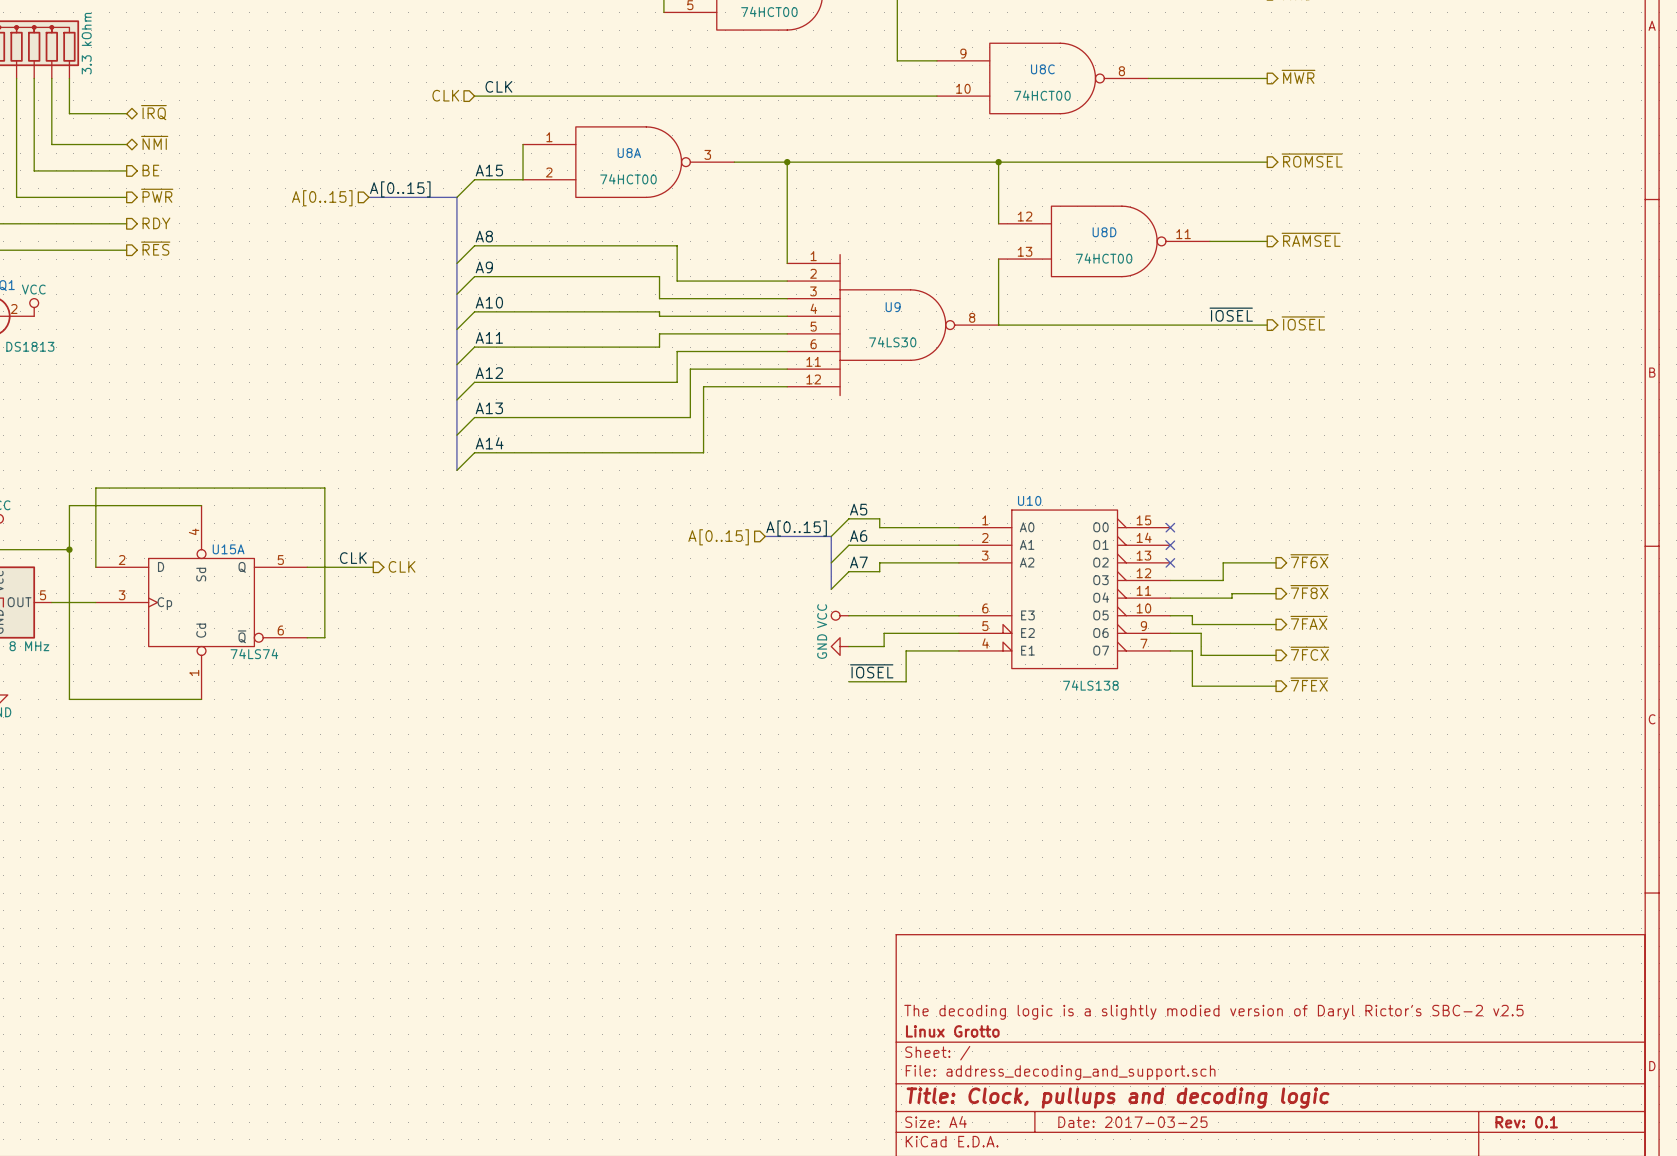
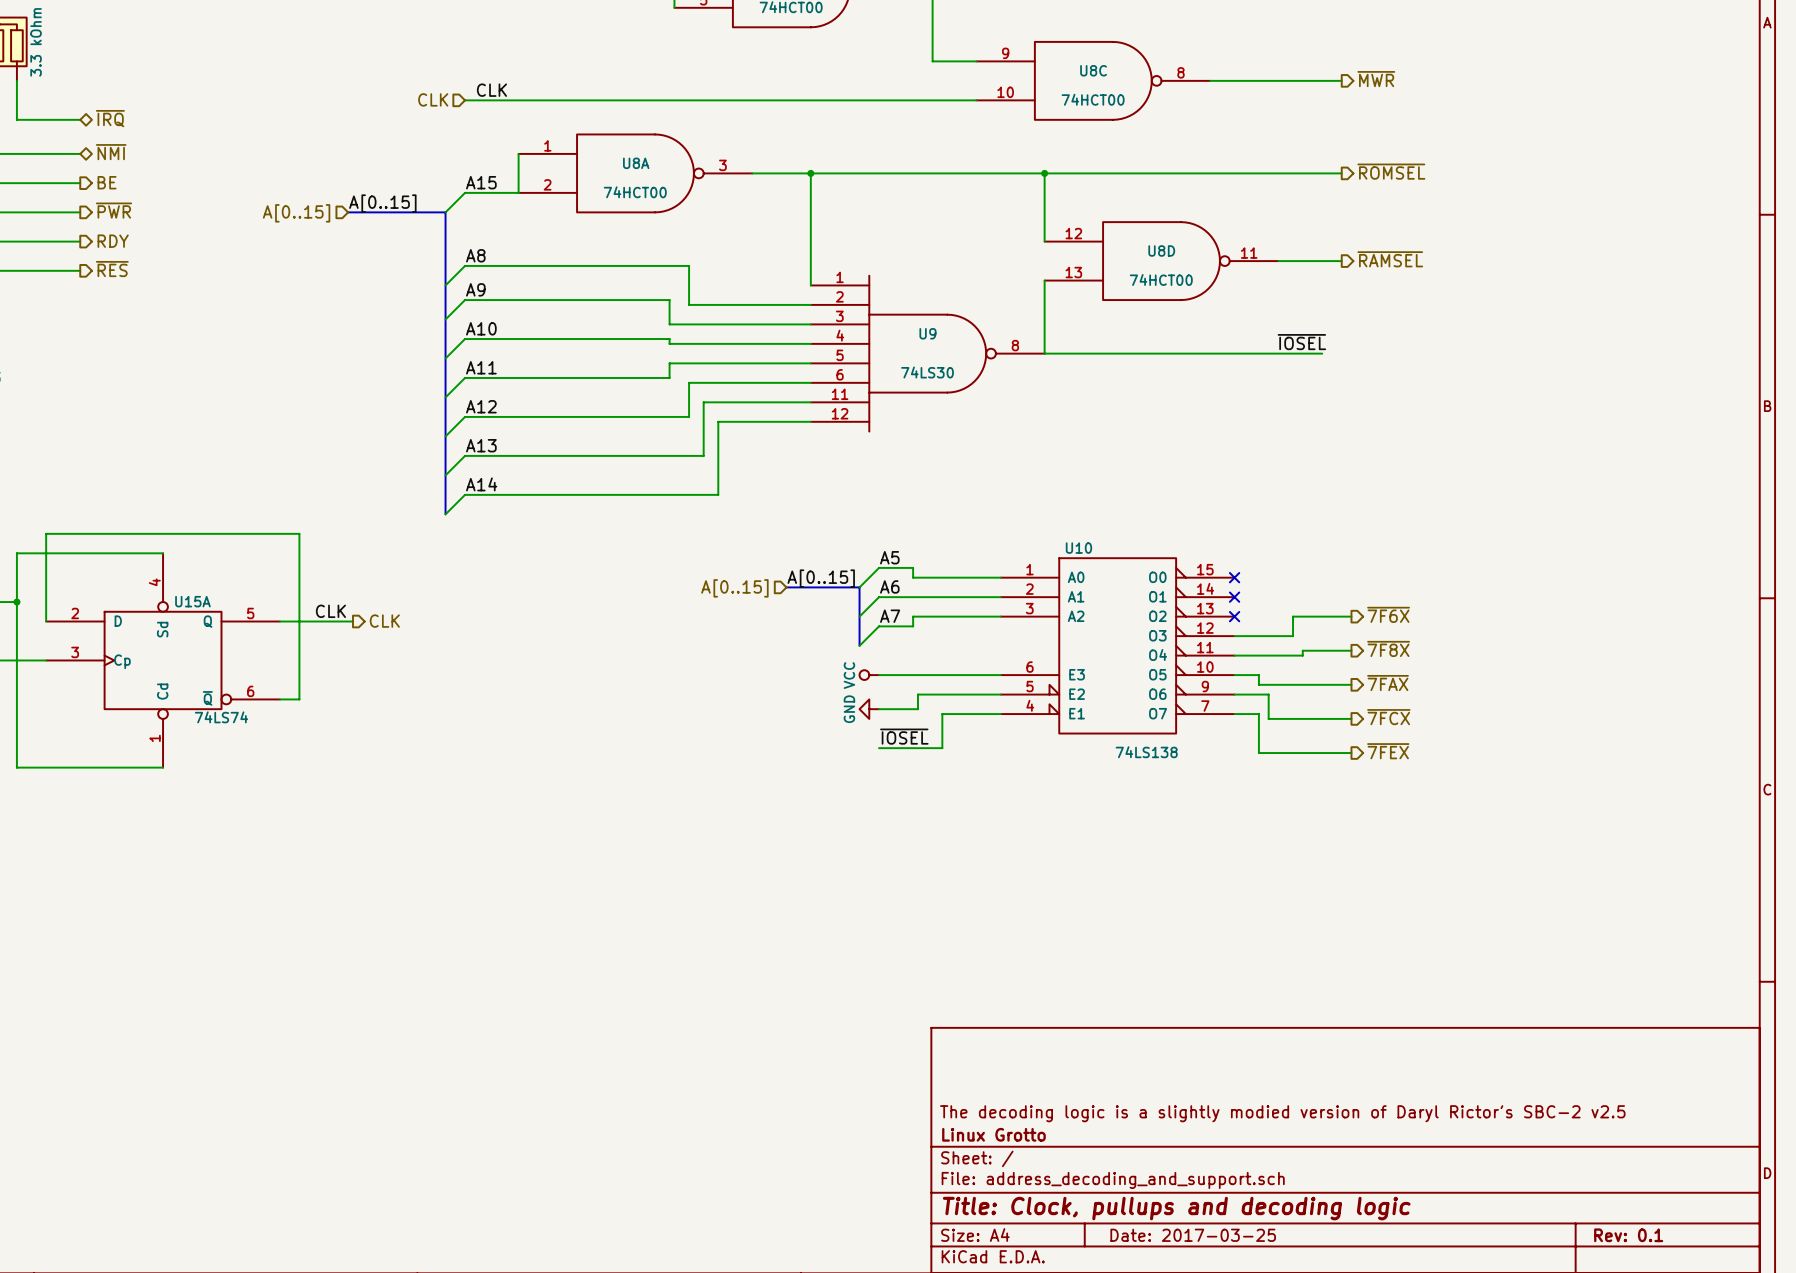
hierarchical label: ~{IOSEL} (1303, 323) -> none
wire: (1249, 325) (1267, 325) -> none

